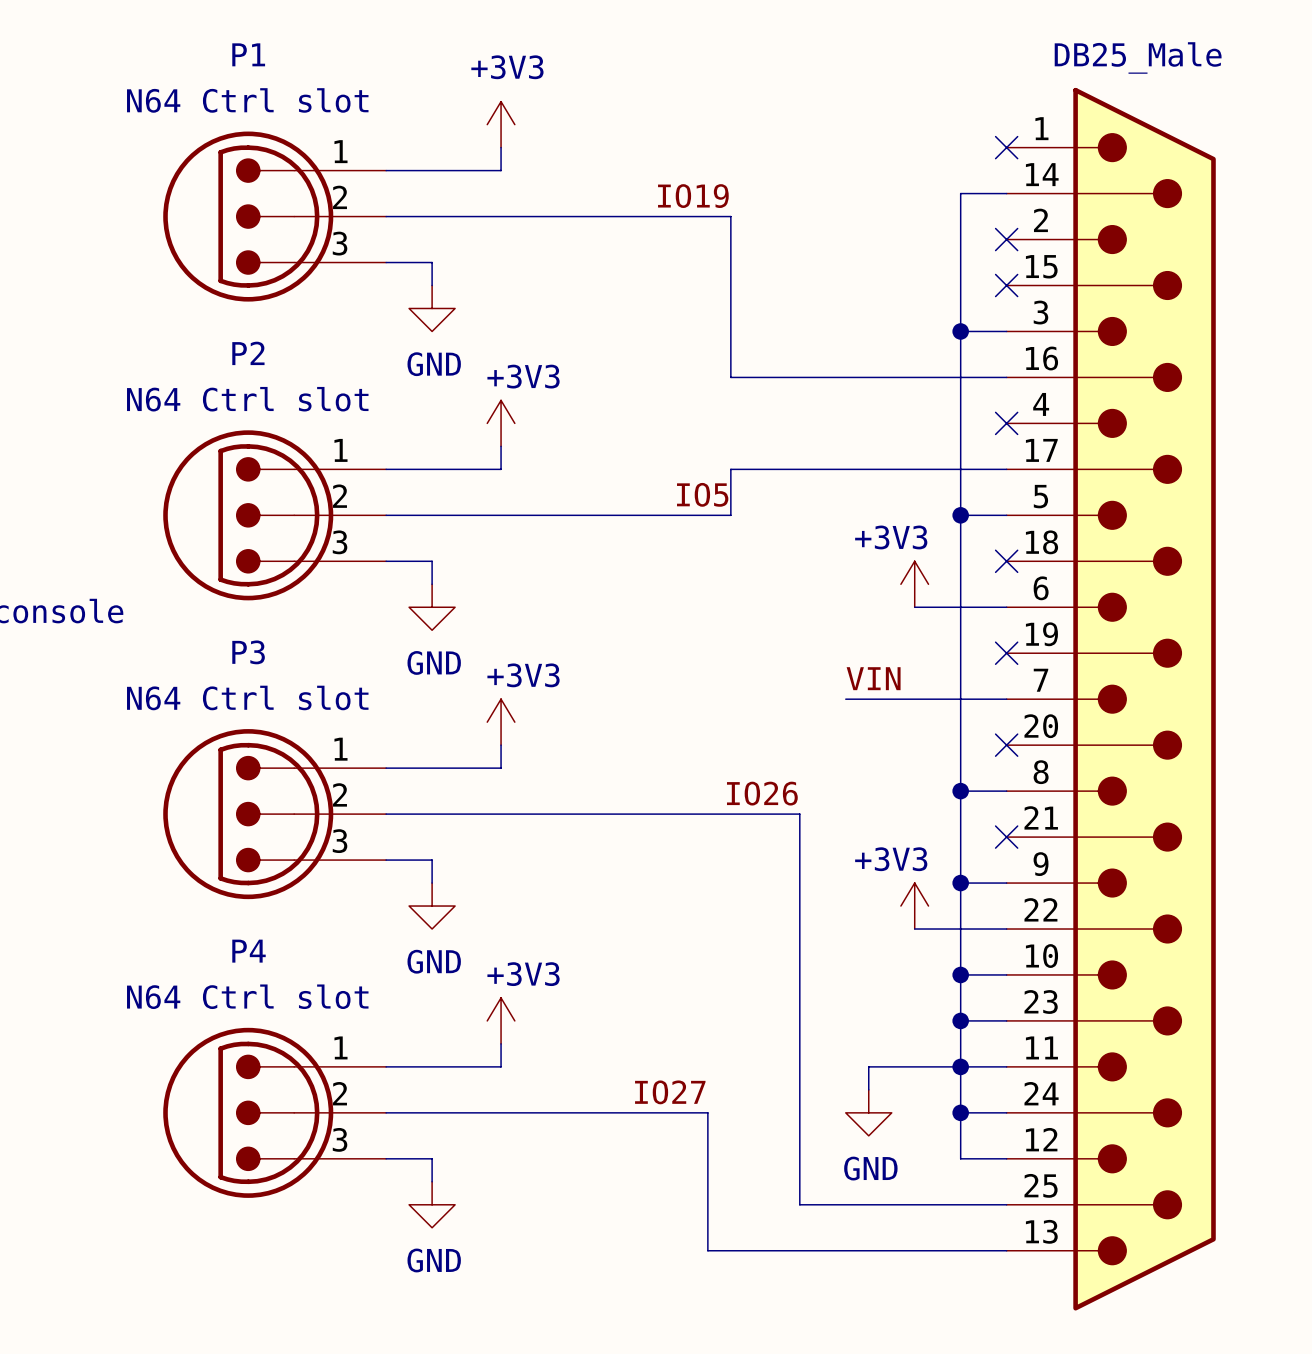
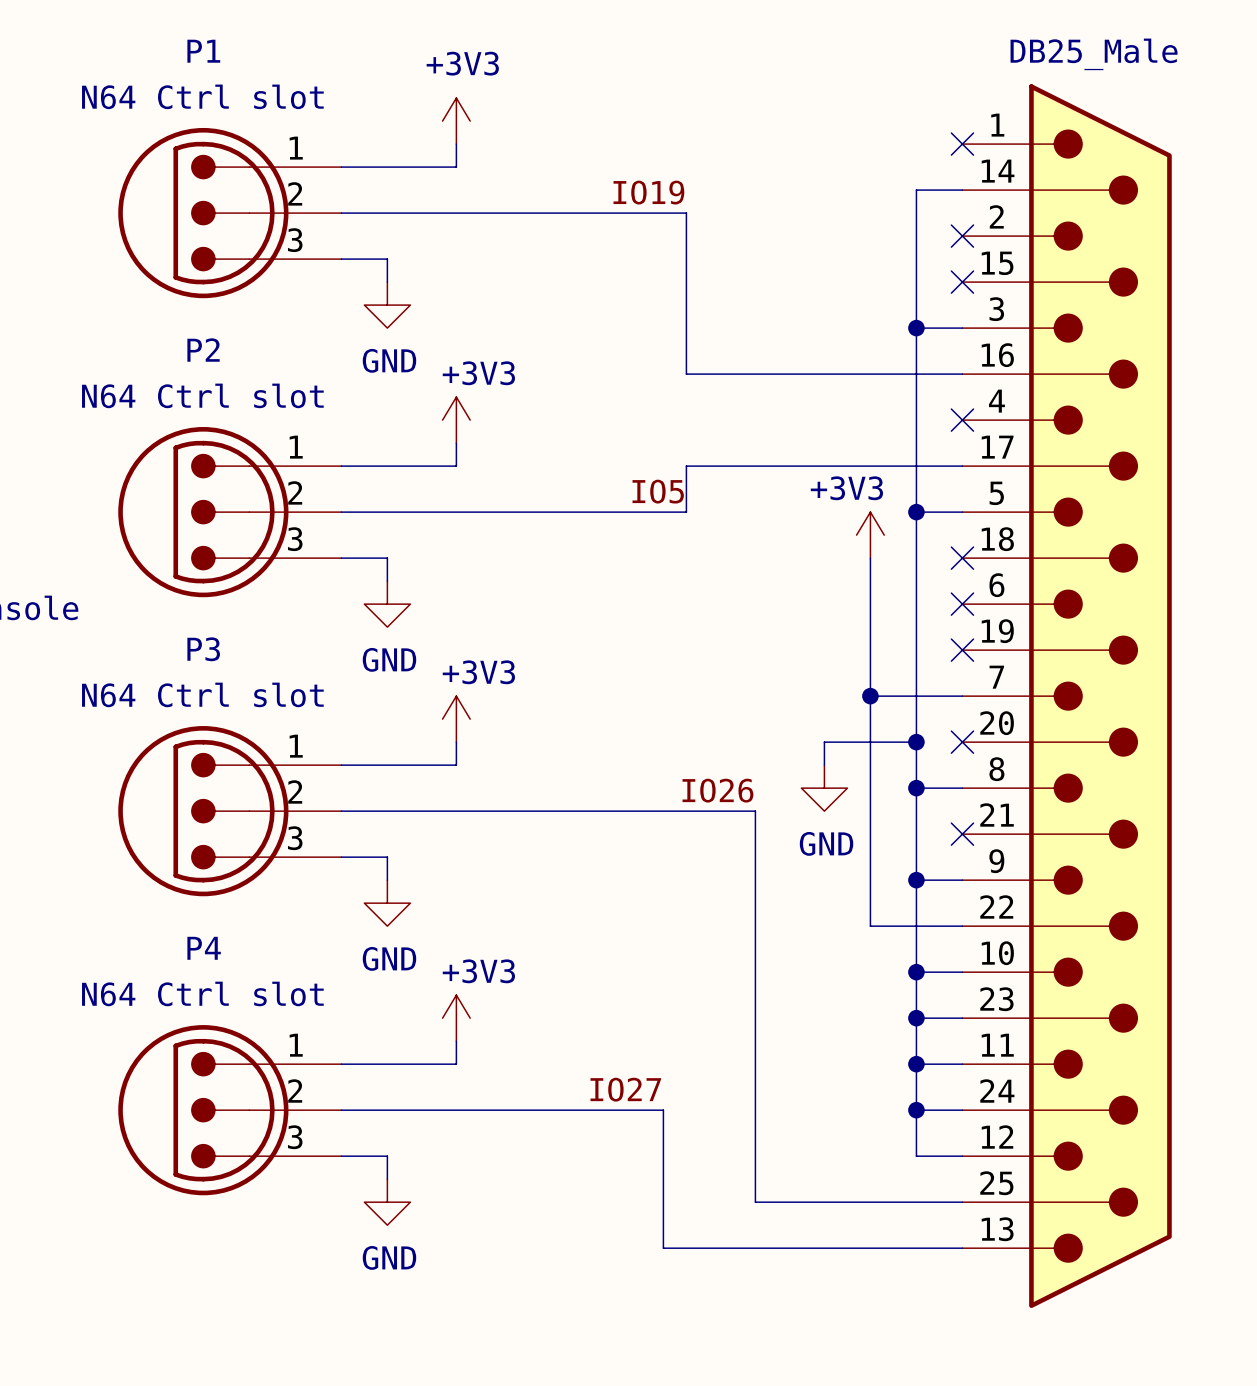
wire: none -> (870, 558) (870, 926)
power symbol position: +3V3 (914, 584) -> +3V3 (870, 535)
wire: (914, 607) (1006, 607) -> none
no-connect mark: none -> (962, 604)
label: VIN (873, 678) -> none
wire: (845, 699) (914, 699) -> none
junction: none -> (870, 696)
junction: none -> (916, 742)
power symbol: +3V3 (914, 906) -> none
wire: (960, 1066) (868, 1066) (868, 1089) -> (916, 742) (824, 742) (824, 765)
power symbol position: GND (868, 1112) -> GND (824, 788)

